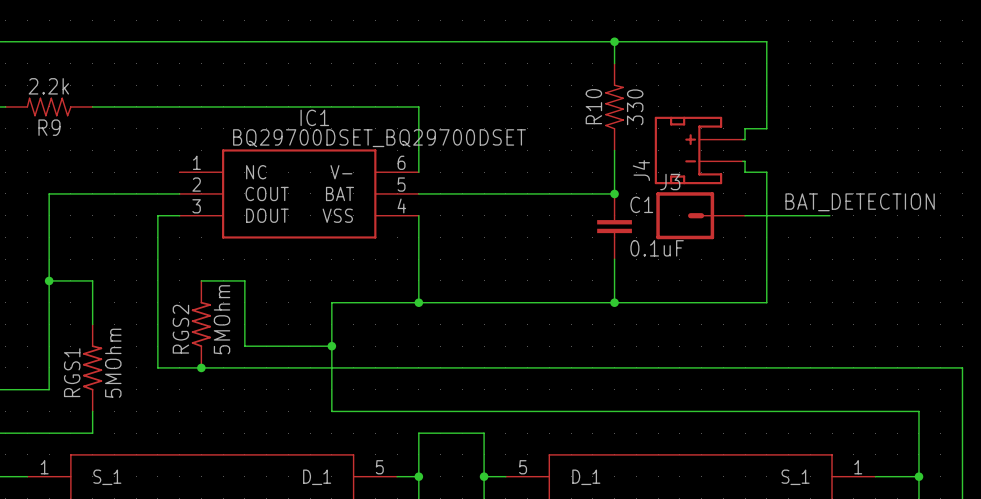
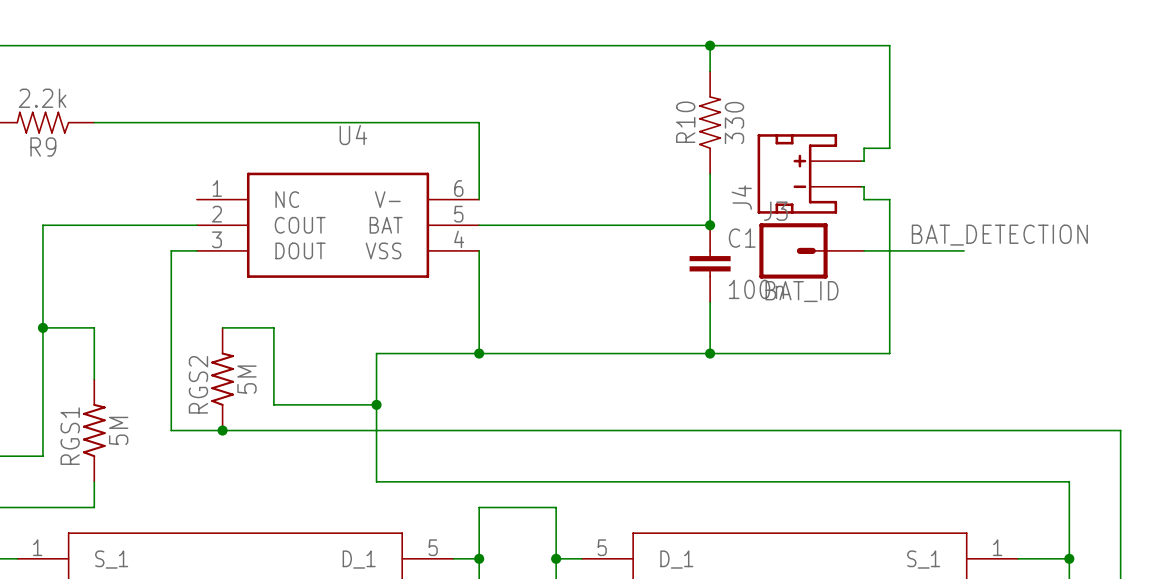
IC1 name: IC1 (314, 117) -> U4 (353, 135)
IC1 value: BQ29700DSET_BQ29700DSET (379, 138) -> none
C1 value: 0.1uF (657, 248) -> 100n (756, 289)
J3 value: none -> BAT_ID (802, 291)
RGS2 value: 5MOhm (222, 319) -> 5M (246, 379)
RGS1 value: 5MOhm (113, 363) -> 5M (118, 430)

